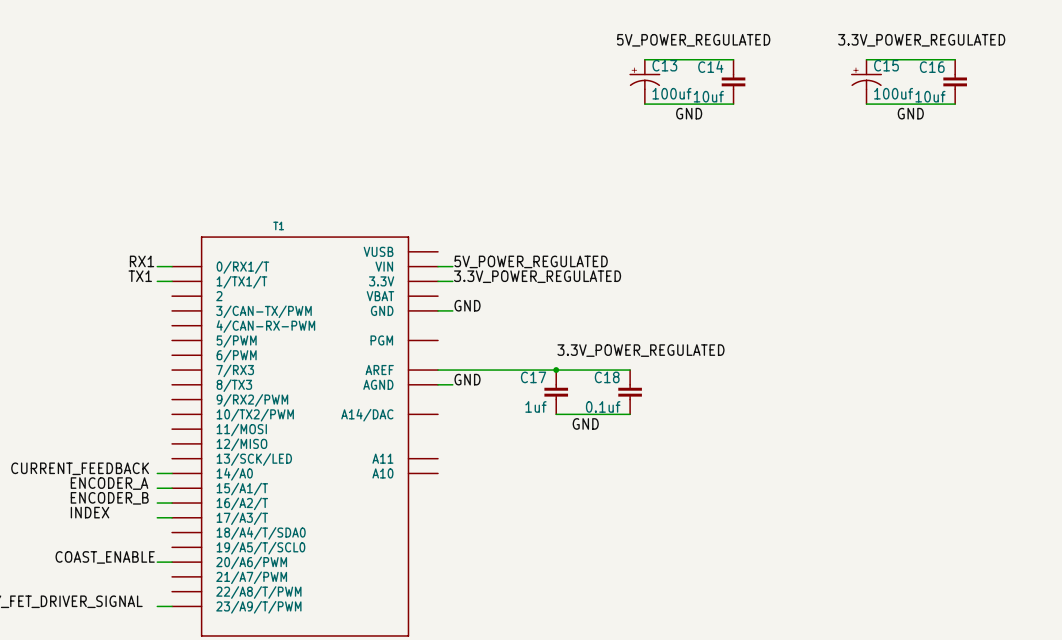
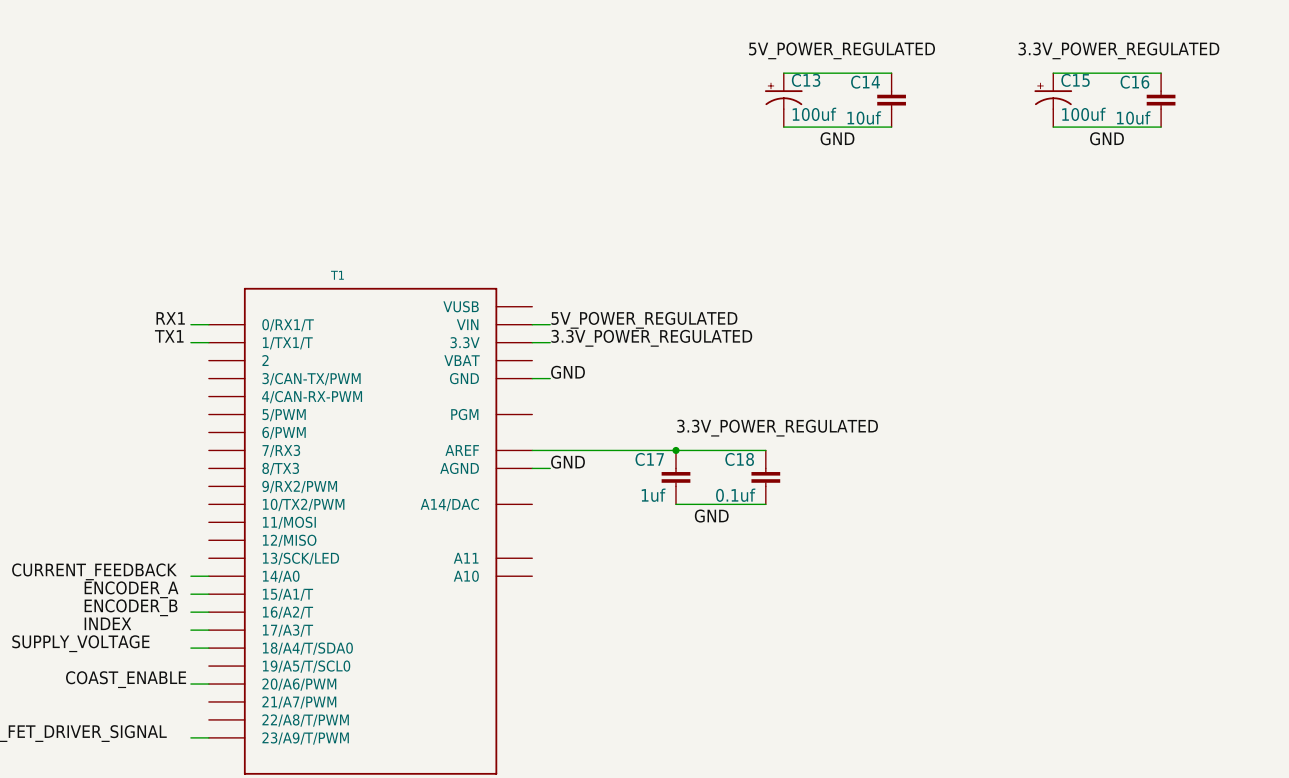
label: none -> SUPPLY_VOLTAGE (80, 643)
wire: none -> (190, 648) (208, 648)

